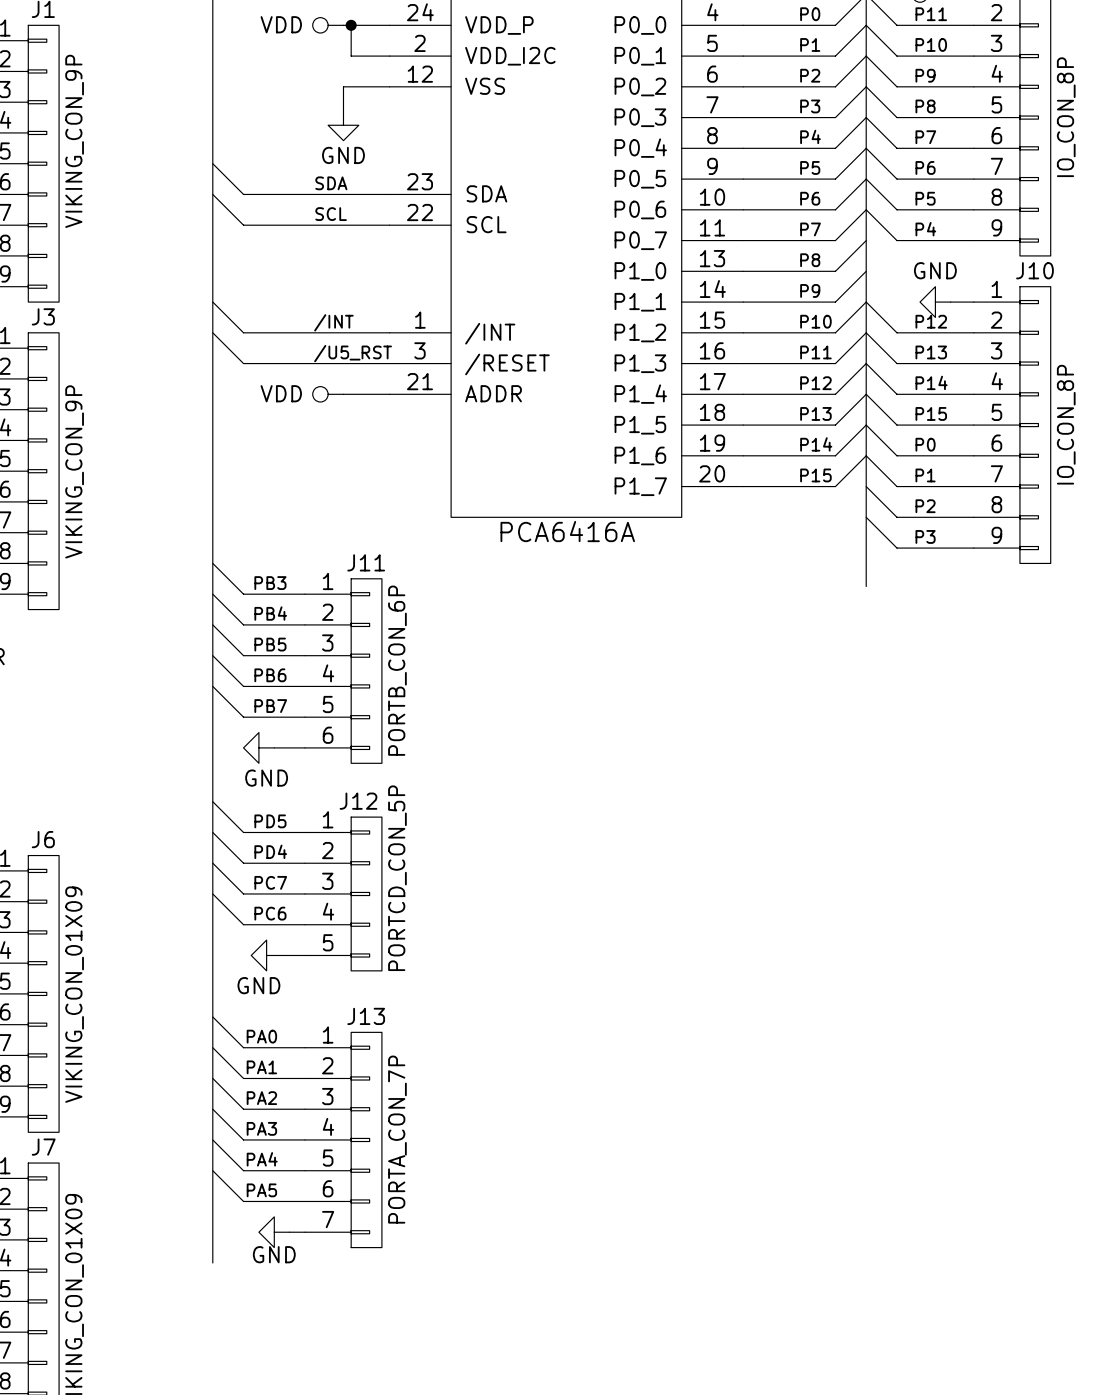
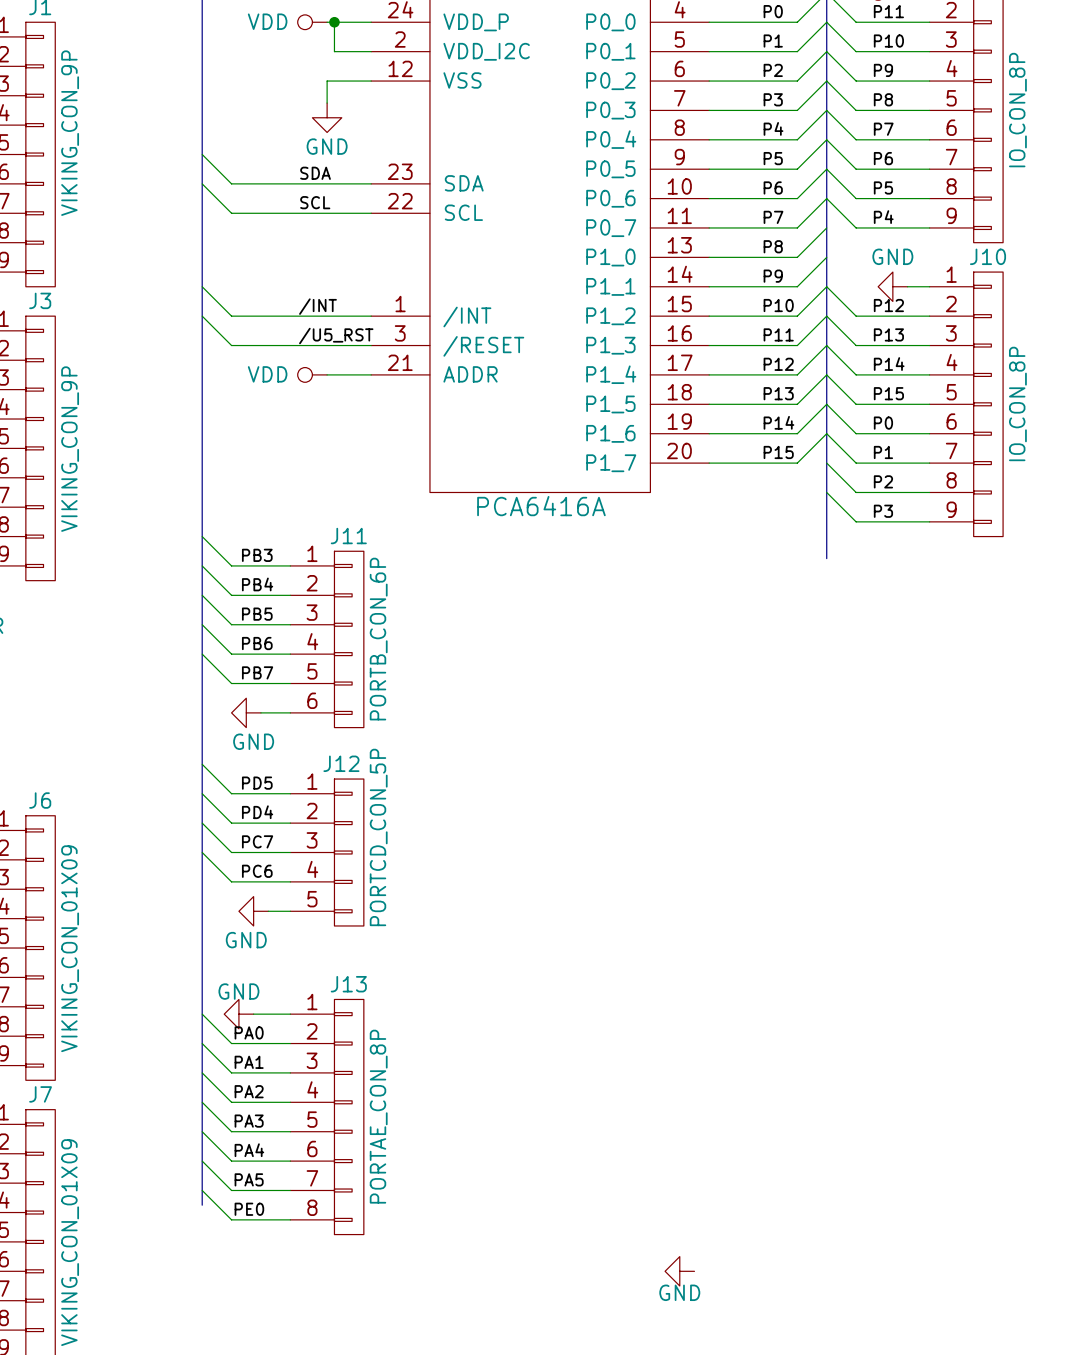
wire: (212, 1016) (243, 1047) (305, 1047) -> (202, 1014) (231, 1043) (290, 1043)
J13 symbol: [305, 1032, 382, 1248] -> [290, 999, 364, 1235]
label position: PA0 (261, 1036) -> PA0 (249, 1032)
wire: (212, 1047) (243, 1078) (305, 1078) -> (202, 1043) (231, 1072) (290, 1072)
wire: none -> (253, 1014) (290, 1014)
label position: PA1 (261, 1067) -> PA1 (249, 1062)
wire: (212, 1078) (243, 1109) (305, 1109) -> (202, 1072) (231, 1102) (290, 1102)
label position: PA2 (261, 1098) -> PA2 (249, 1091)
wire: (212, 1109) (243, 1139) (305, 1139) -> (202, 1102) (231, 1131) (290, 1131)
label position: PA3 (261, 1128) -> PA3 (249, 1121)
wire: (212, 1139) (243, 1170) (305, 1170) -> (202, 1131) (231, 1161) (290, 1161)
J13 value: PORTA_CON_7P (397, 1139) -> PORTAE_CON_8P (378, 1116)
label position: PA4 (262, 1159) -> PA4 (249, 1150)
wire: (212, 1170) (243, 1201) (305, 1201) -> (202, 1161) (231, 1190) (290, 1190)
label position: PA5 (261, 1190) -> PA5 (249, 1179)
power symbol position: GND (274, 1232) -> GND (238, 1014)
wire: (289, 1232) (305, 1232) -> none
wire: none -> (202, 1190) (231, 1219) (290, 1219)
power symbol text position: GND (274, 1254) -> GND (238, 991)
label: none -> PE0 (249, 1209)
power symbol: none -> GND (679, 1271)

